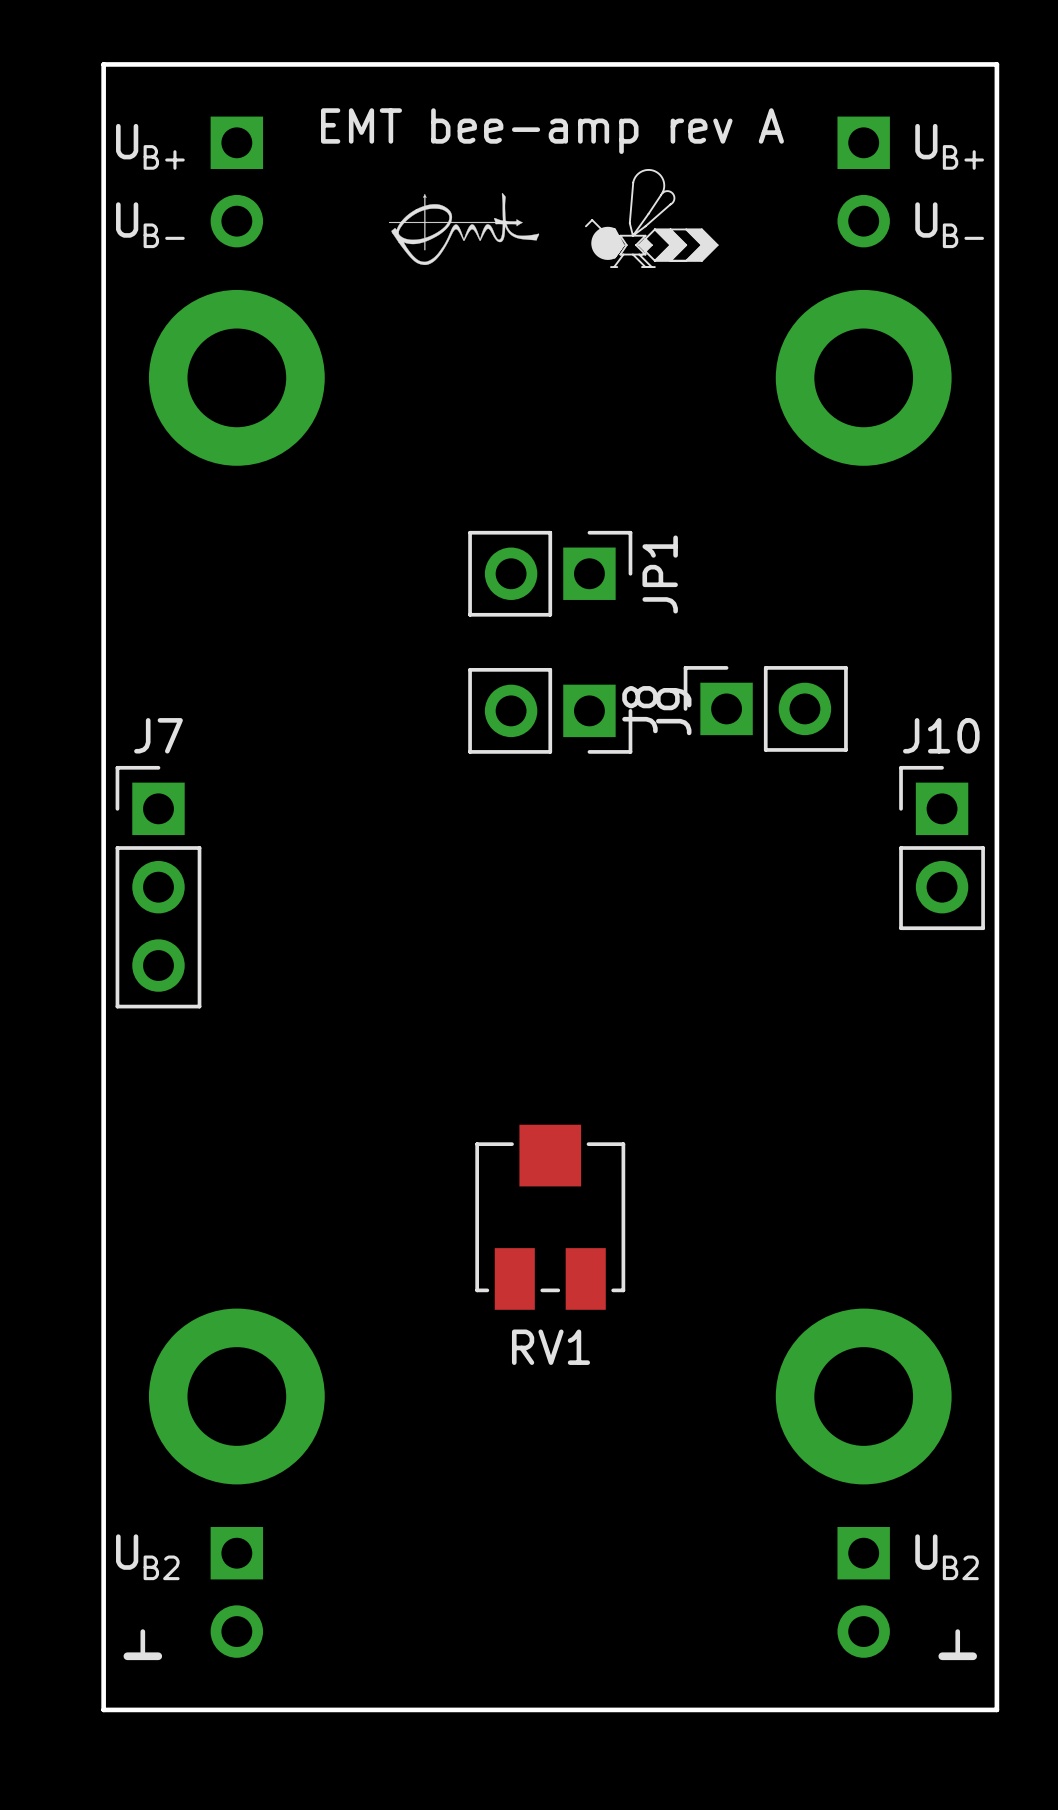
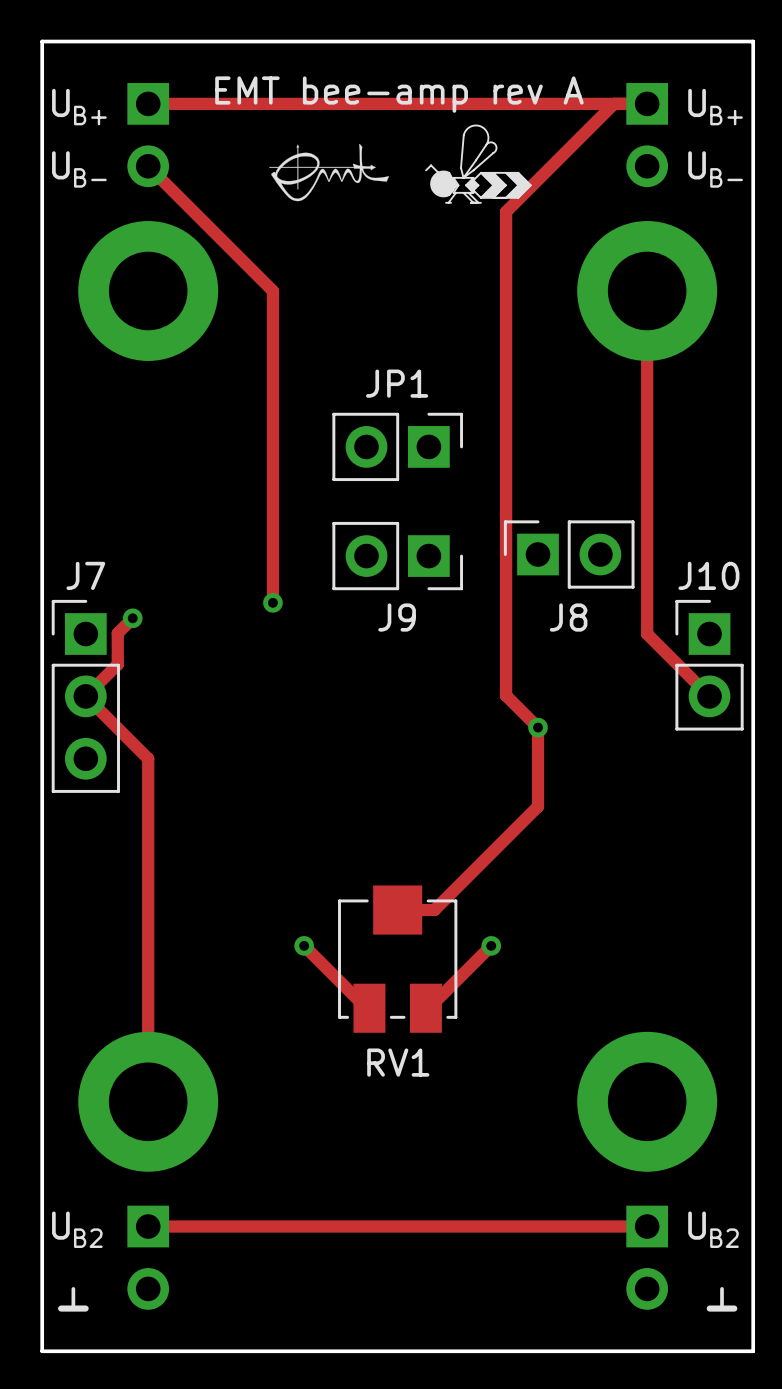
track: none -> (148, 103) (647, 103)
track: none -> (614, 103) (506, 211) (506, 695) (538, 727) (538, 806) (434, 910) (397, 910)
track: none -> (148, 166) (272, 291) (272, 602)
track: none -> (647, 291) (647, 634) (709, 696)
JP1 name rotation: 0° (660, 574) -> 90° clockwise (397, 383)
JP1 name position: JP1 (660, 574) -> JP1 (397, 383)
J8 name rotation: 0° (639, 709) -> 90° clockwise (568, 617)
J8 name position: J8 (639, 709) -> J8 (568, 617)
J9 name rotation: 0° (673, 711) -> 90° clockwise (397, 617)
J9 name position: J9 (673, 711) -> J9 (397, 617)
via: none -> (272, 602)
track: none -> (132, 618) (117, 633) (117, 664) (85, 696) (148, 758) (148, 1101)
via: none -> (132, 618)
via: none -> (538, 727)
track: none -> (304, 945) (366, 1008) (369, 1008)
via: none -> (304, 945)
track: none -> (491, 945) (428, 1008) (425, 1008)
via: none -> (491, 945)
track: none -> (148, 1226) (647, 1226)

